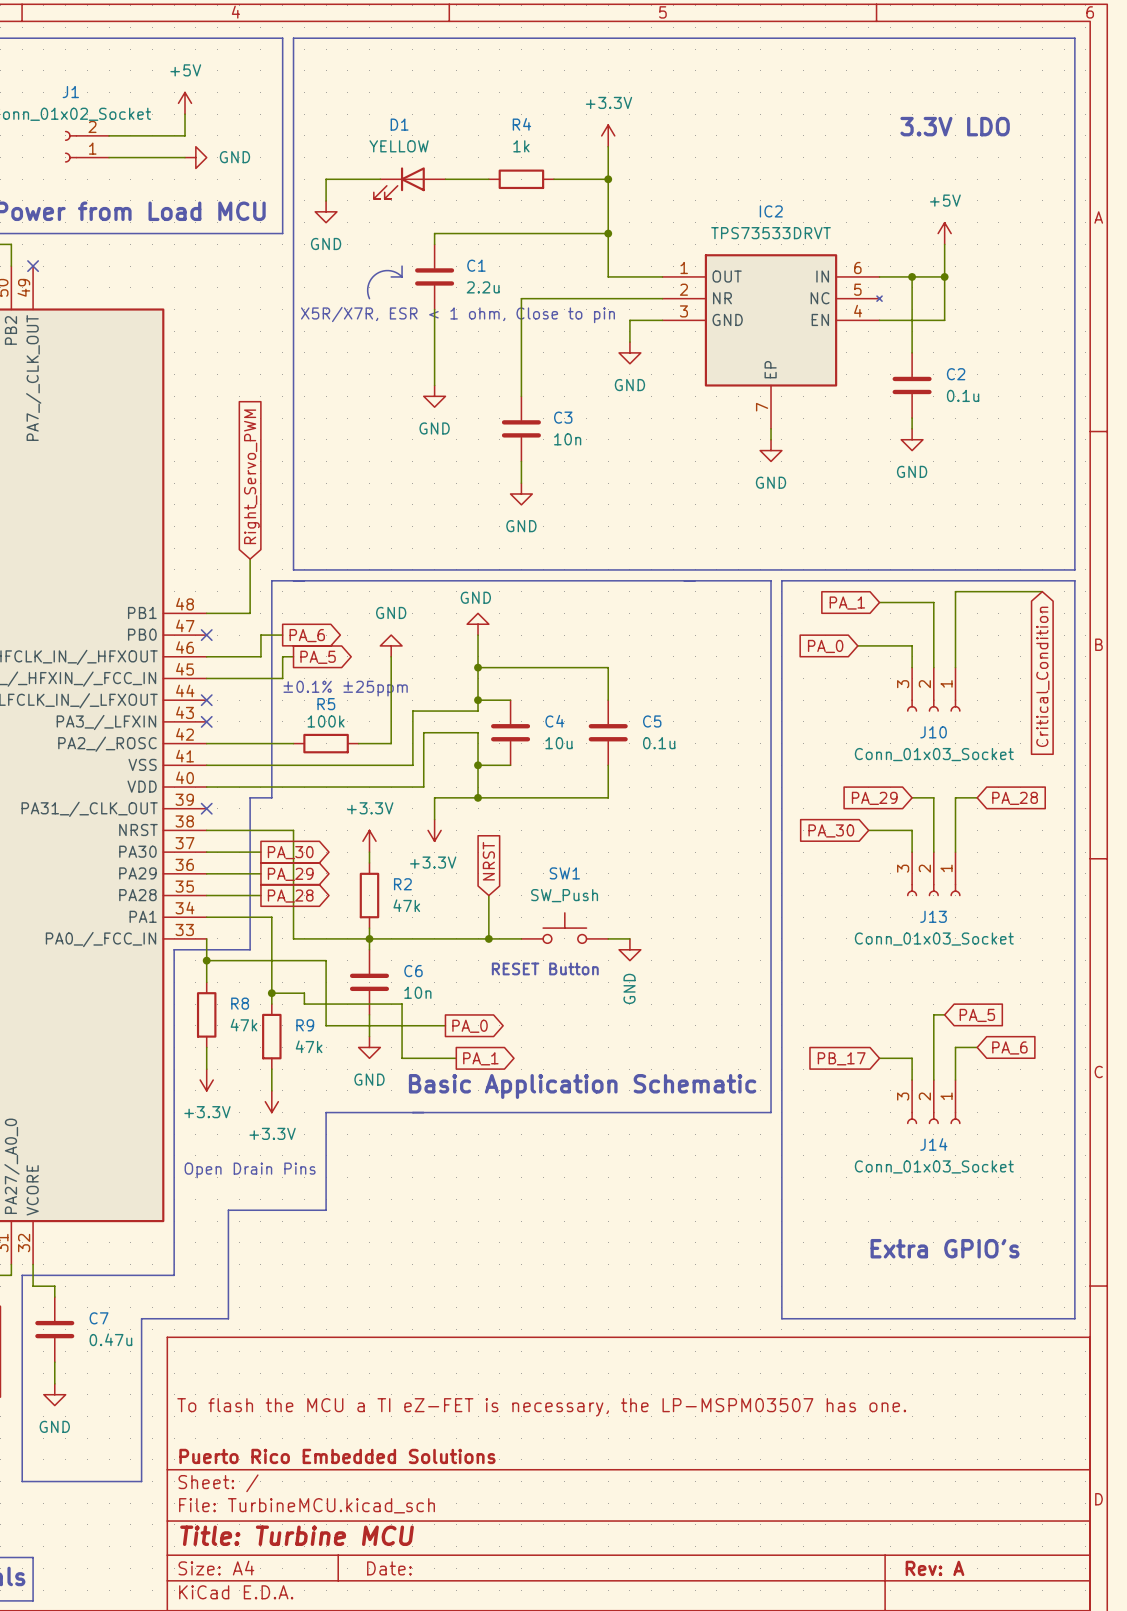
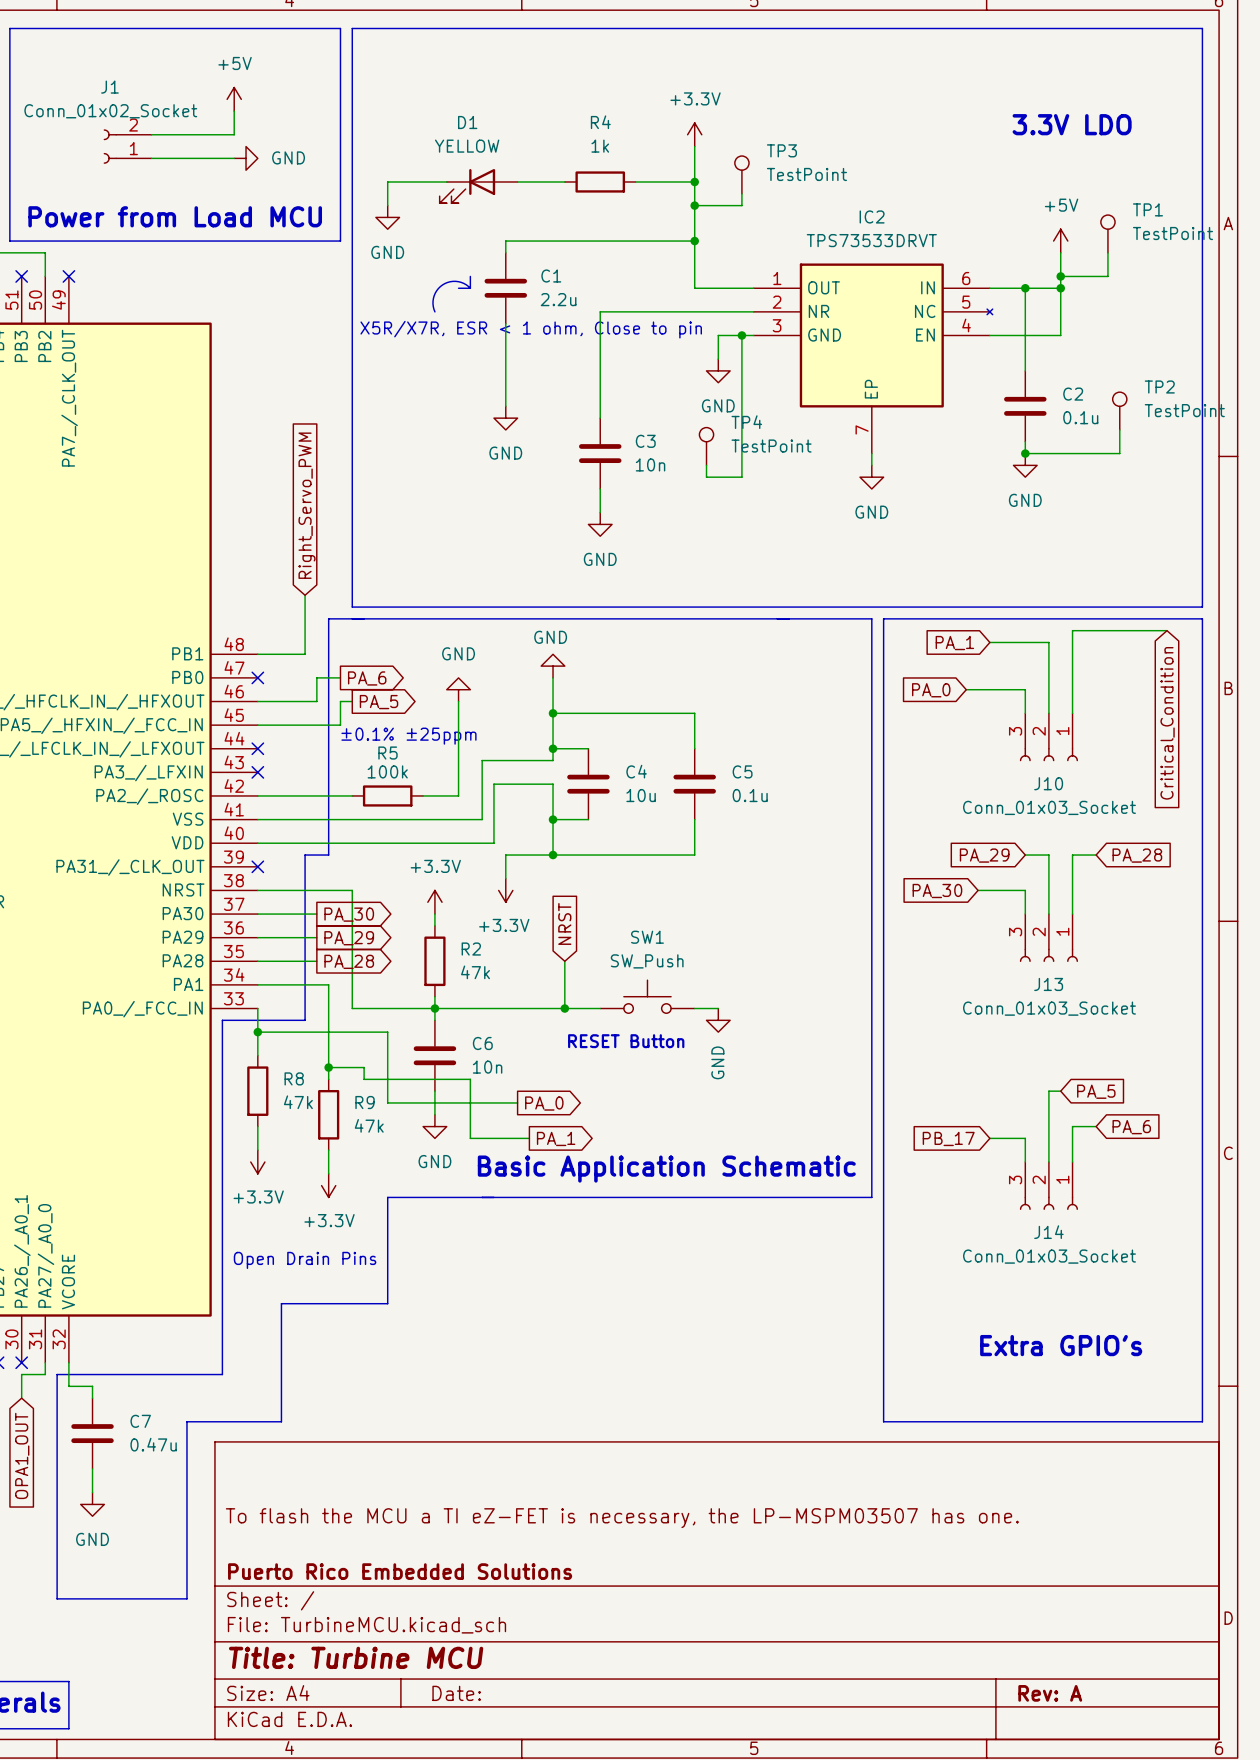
TP3: none -> TestPoint (741, 174)
wire: none -> (741, 193) (741, 205) (694, 205)
junction: none -> (694, 205)
TP1: none -> TestPoint (1107, 233)
wire: none -> (1107, 252) (1107, 276) (1060, 276)
junction: none -> (1060, 276)
wire: none -> (741, 335) (741, 477) (706, 477) (706, 465)
junction: none -> (741, 335)
TP2: none -> TestPoint (1119, 411)
wire: none -> (1119, 429) (1119, 453) (1025, 453)
TP4: none -> TestPoint (706, 446)
junction: none -> (1025, 453)

